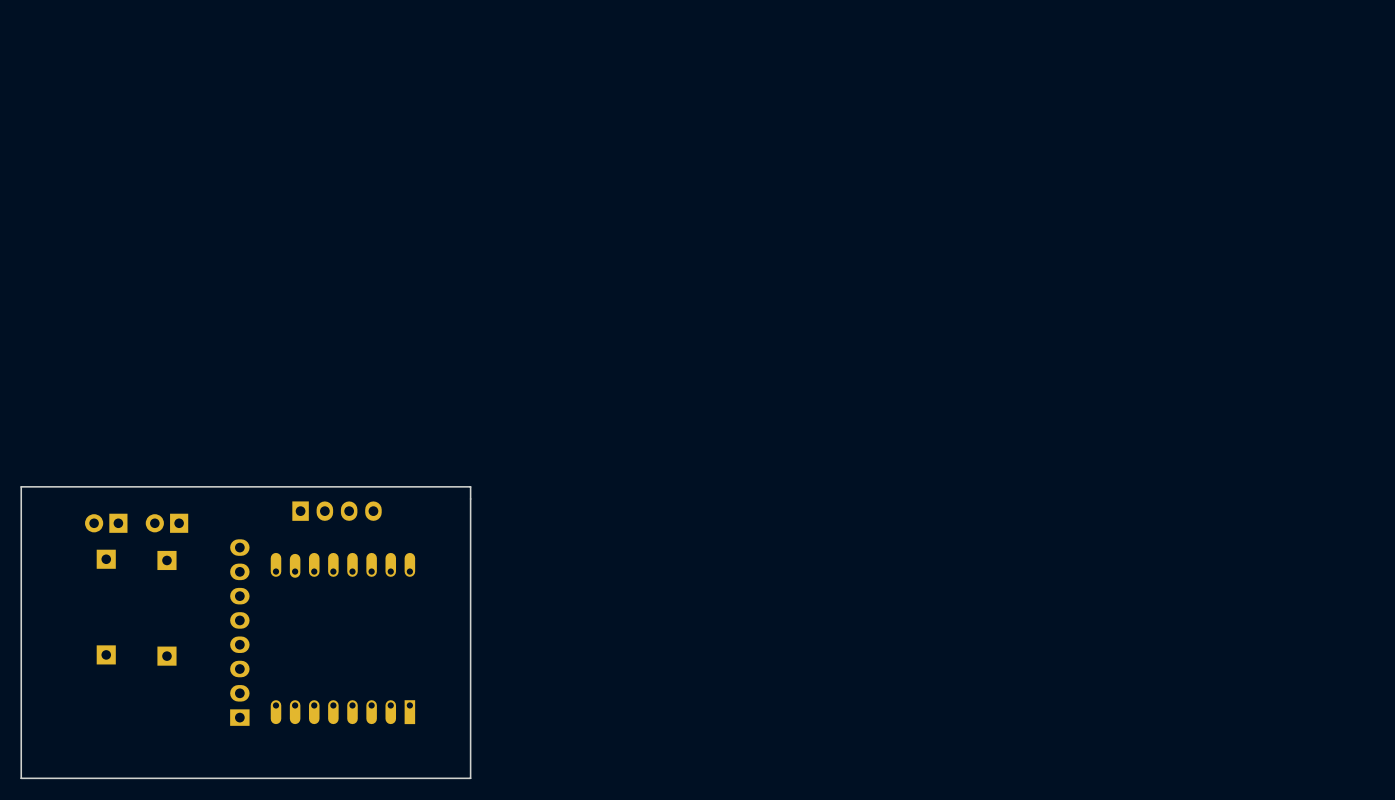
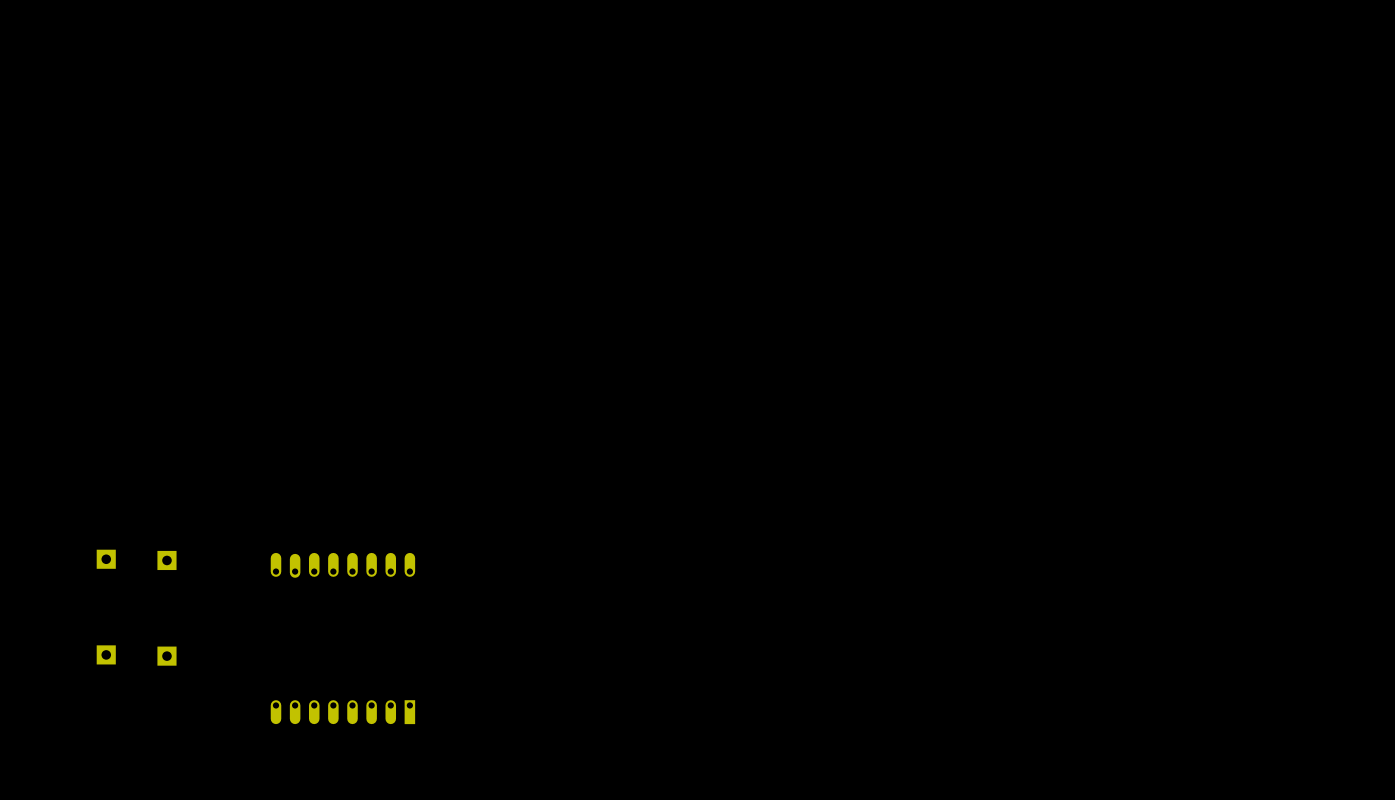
board edge: (470, 486) (470, 778) (21, 778) (21, 486) (470, 486) -> none
part: (337, 511) -> none
part: (106, 523) -> none
part: (166, 523) -> none
part: (239, 632) -> none

